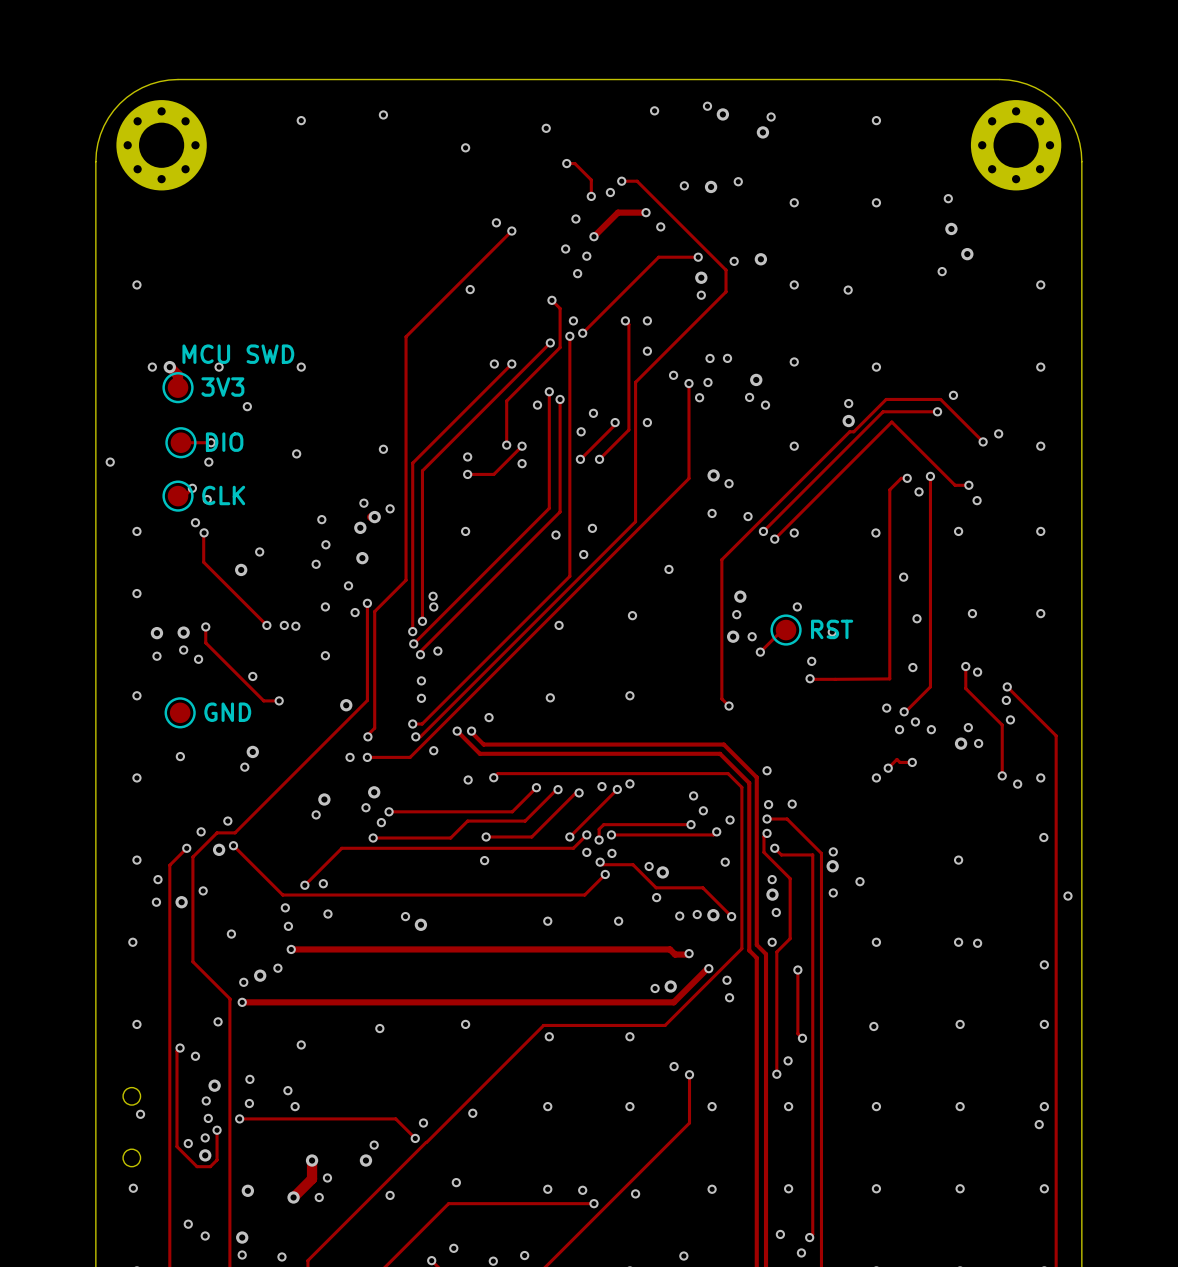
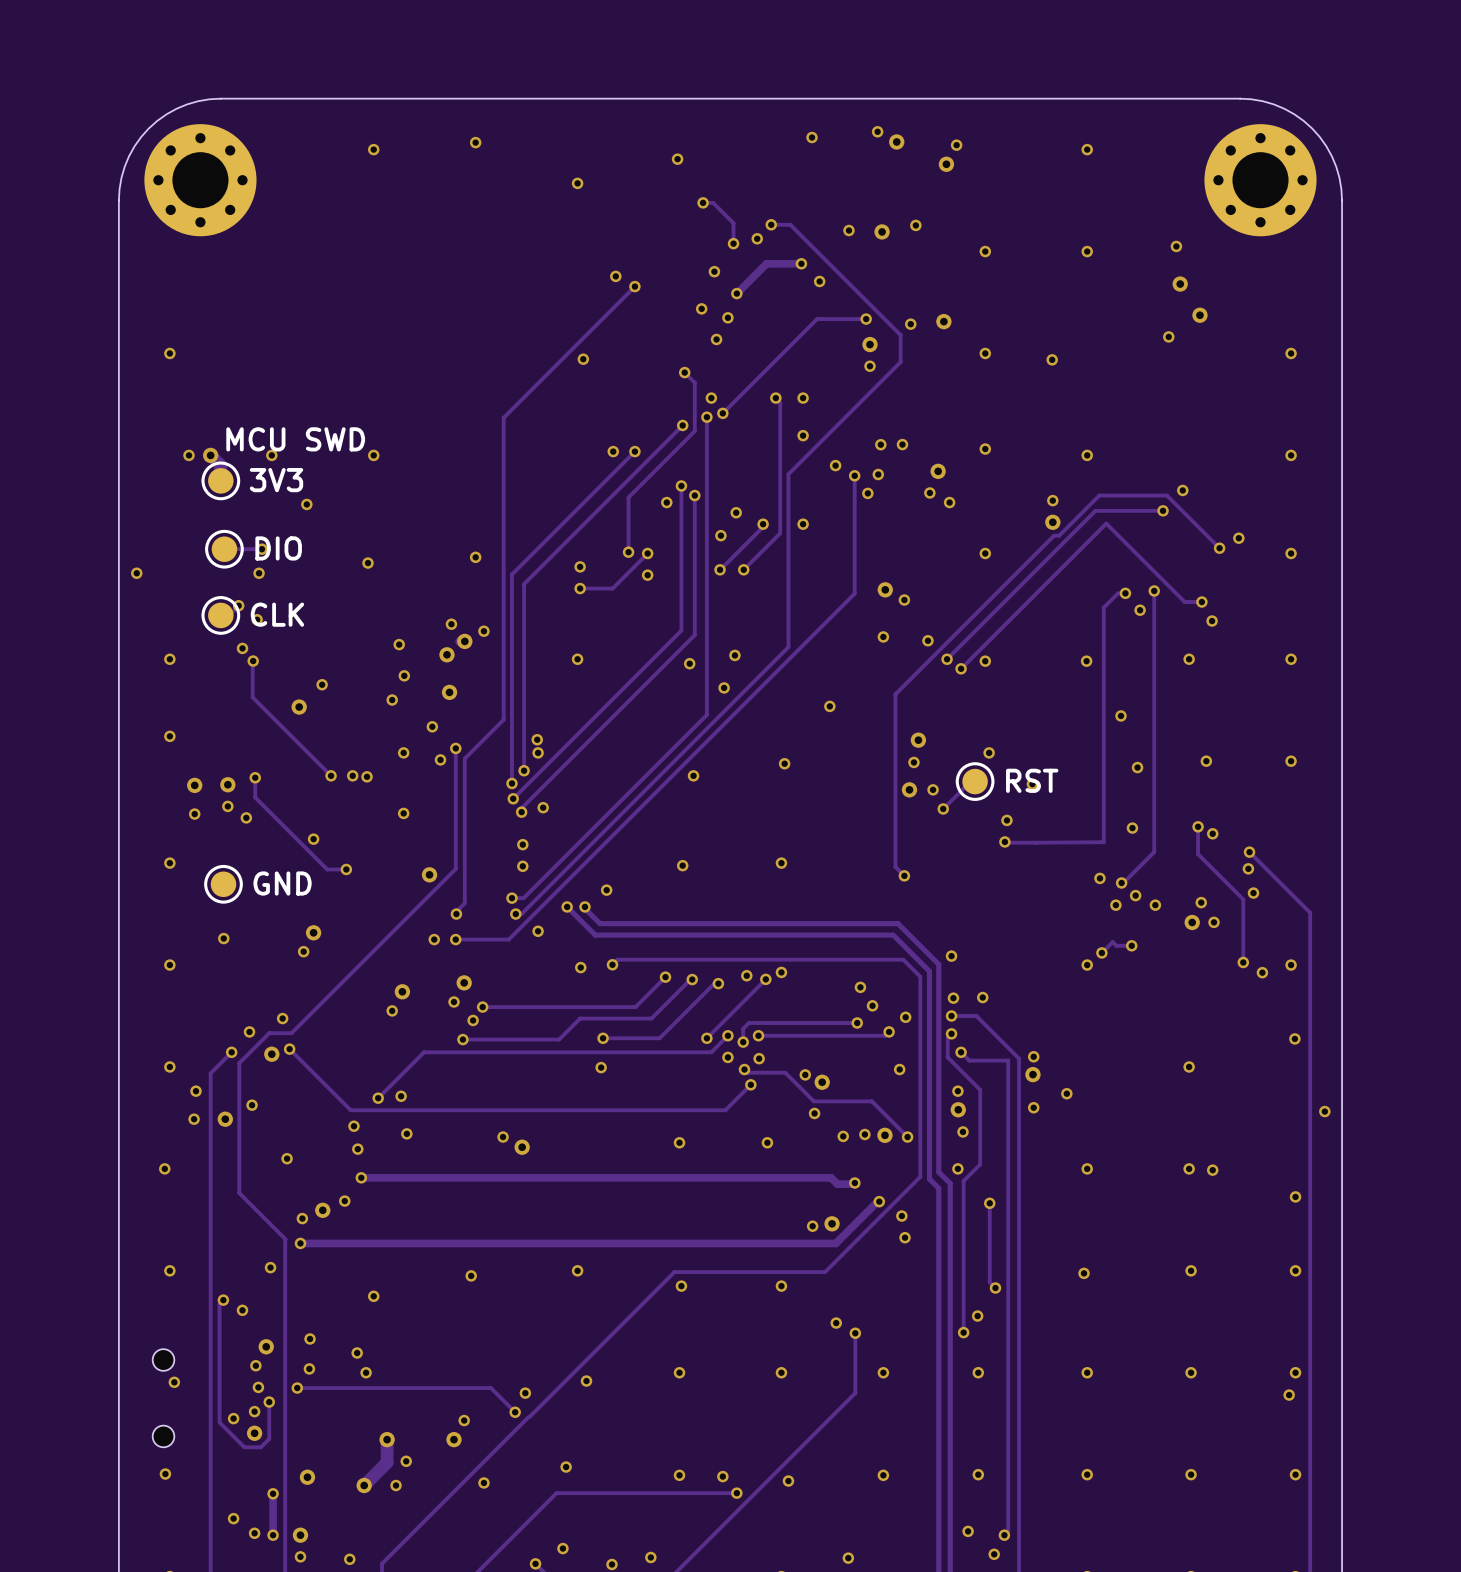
track: none -> (273, 1493) (273, 1535)
via: none -> (273, 1493)
via: none -> (273, 1535)

